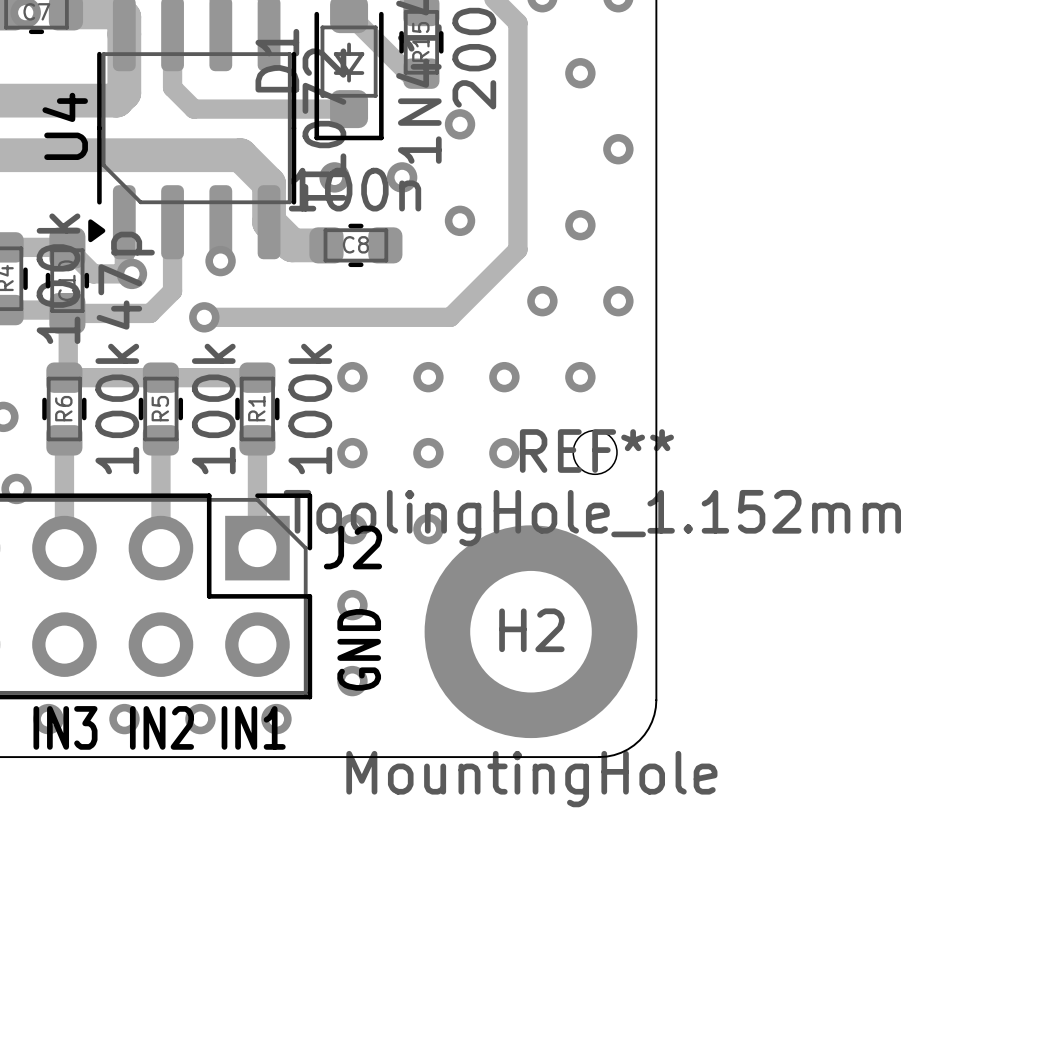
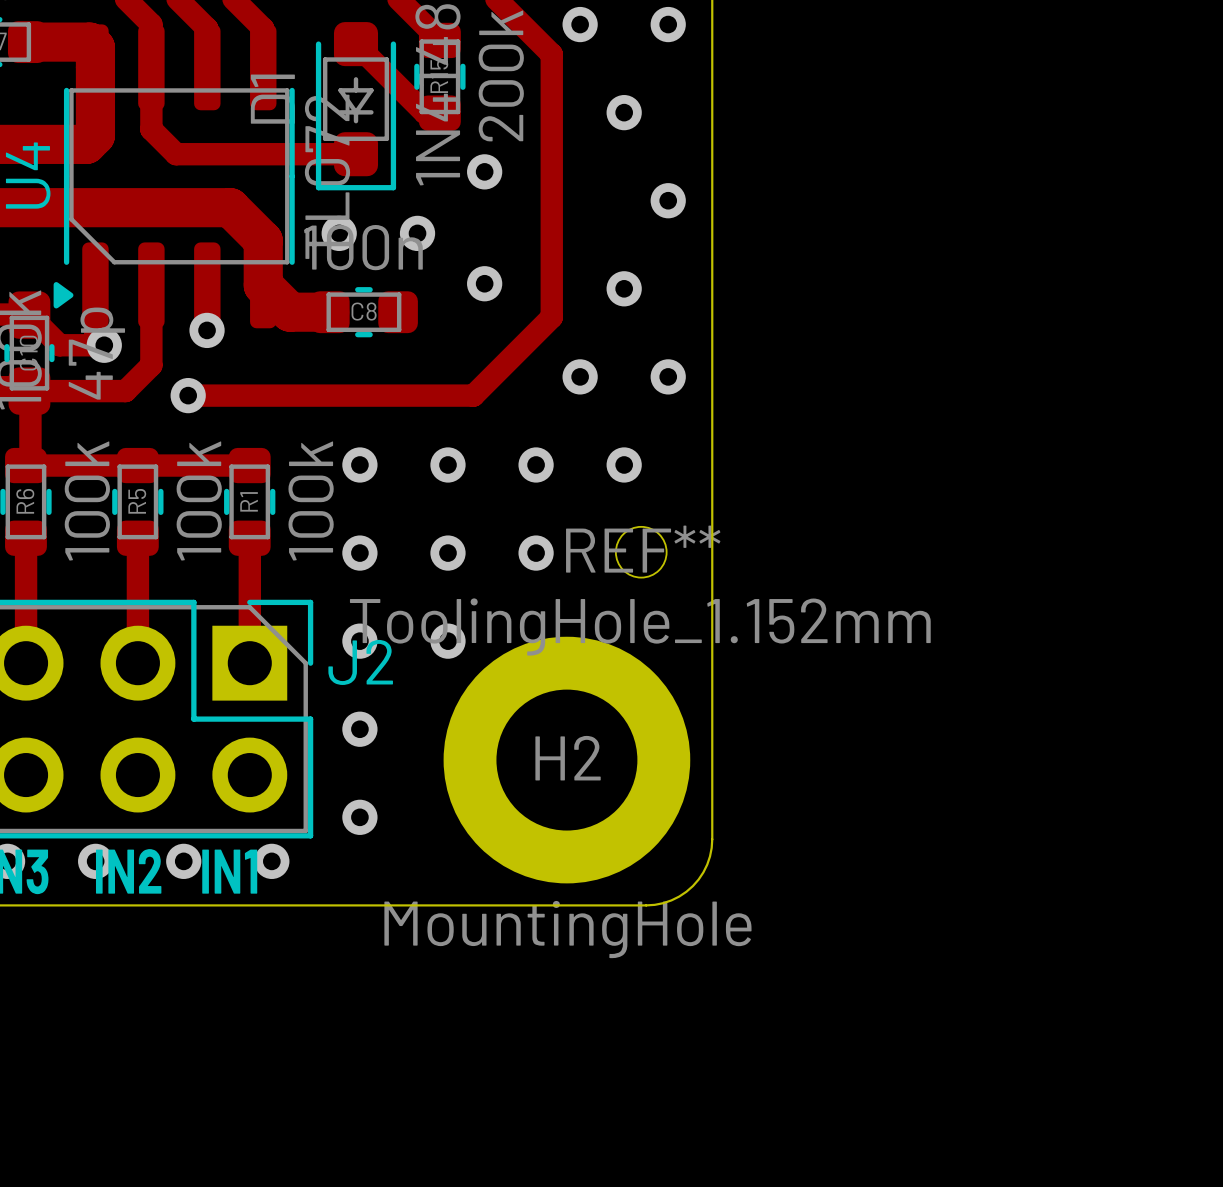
text: GND (359, 649) -> none

